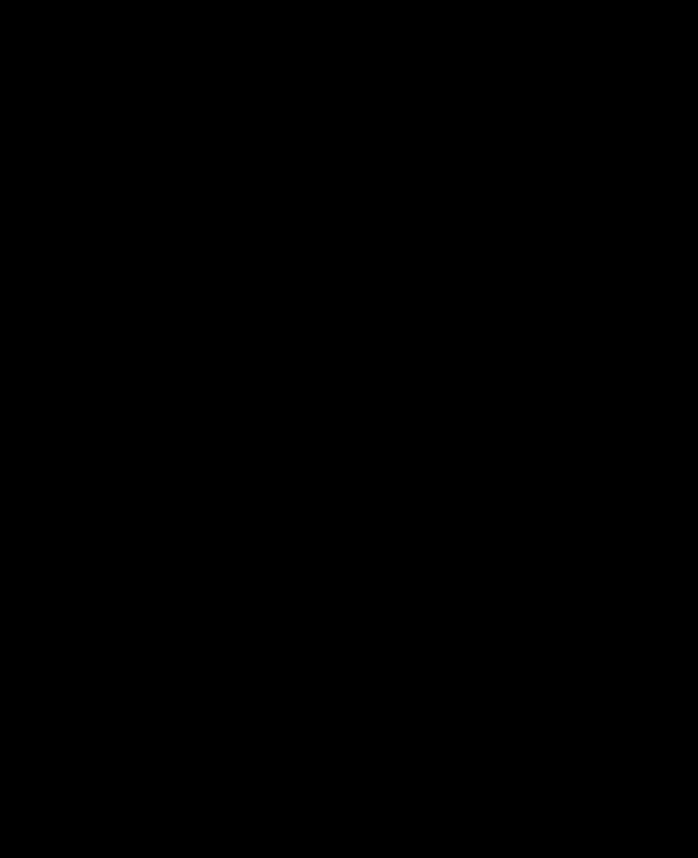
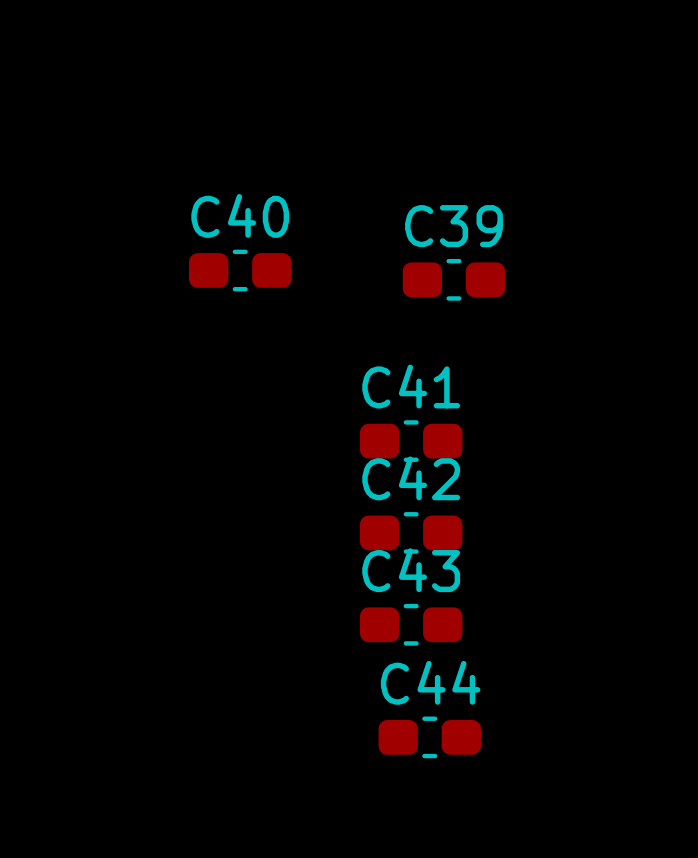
C40: none -> (240, 270)
C39: none -> (453, 279)
C41: none -> (411, 441)
C42: none -> (411, 532)
C43: none -> (411, 624)
C44: none -> (429, 737)

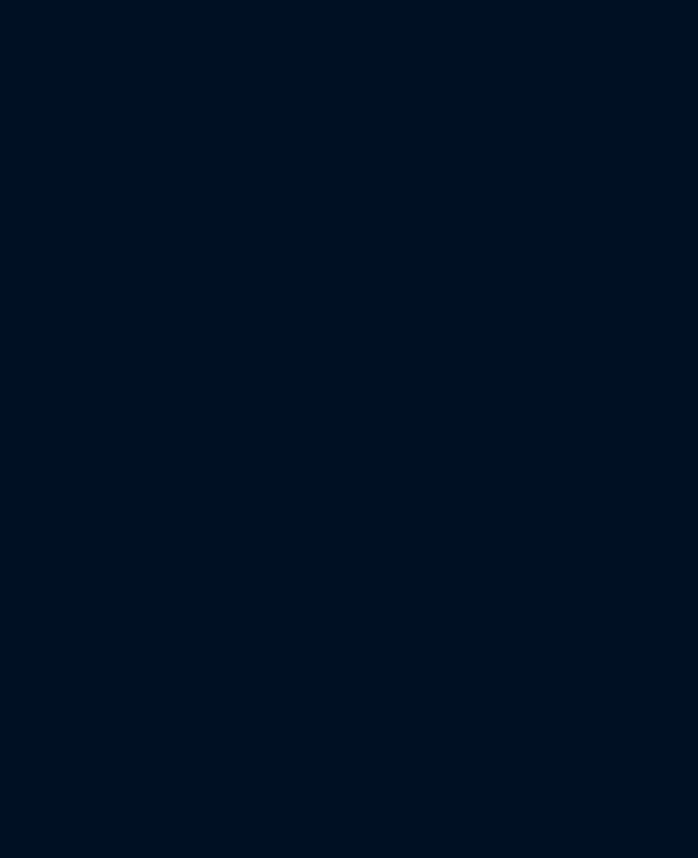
C40: (240, 270) -> none
C39: (453, 279) -> none
C41: (411, 441) -> none
C42: (411, 532) -> none
C43: (411, 624) -> none
C44: (429, 737) -> none

